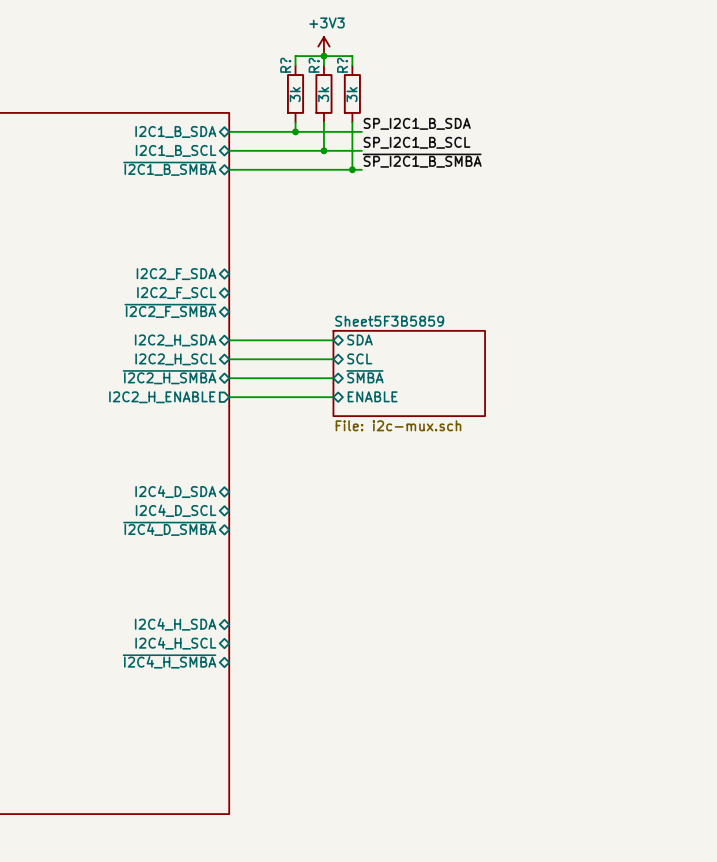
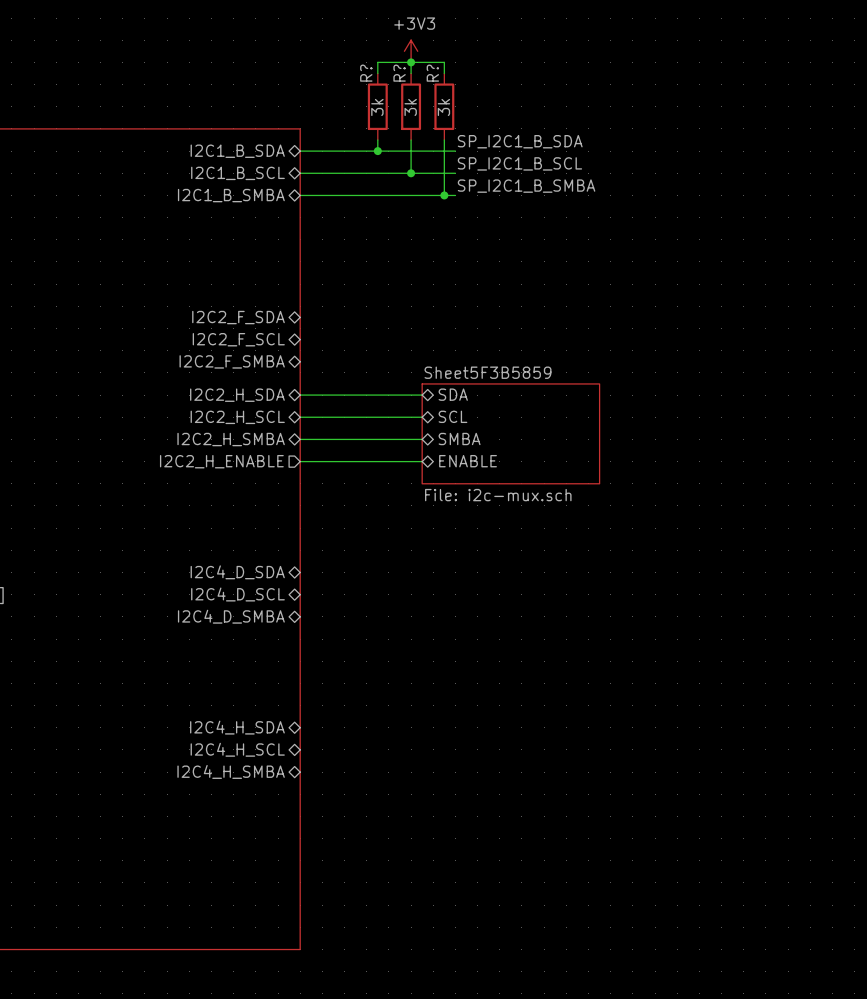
label: ~{SP_I2C1_B_SMBA} (422, 160) -> SP_I2C1_B_SMBA (526, 186)
sheet pin: ~{I2C1_B_SMBA} (169, 168) -> I2C1_B_SMBA (231, 195)
sheet pin: ~{I2C2_F_SMBA} (170, 310) -> I2C2_F_SMBA (232, 361)
sheet pin: ~{SMBA} (364, 376) -> SMBA (459, 439)
sheet pin: ~{I2C2_H_SMBA} (169, 377) -> I2C2_H_SMBA (231, 439)
sheet pin: ~{I2C4_D_SMBA} (169, 528) -> I2C4_D_SMBA (231, 616)
sheet pin: ~{I2C4_H_SMBA} (169, 661) -> I2C4_H_SMBA (231, 771)

